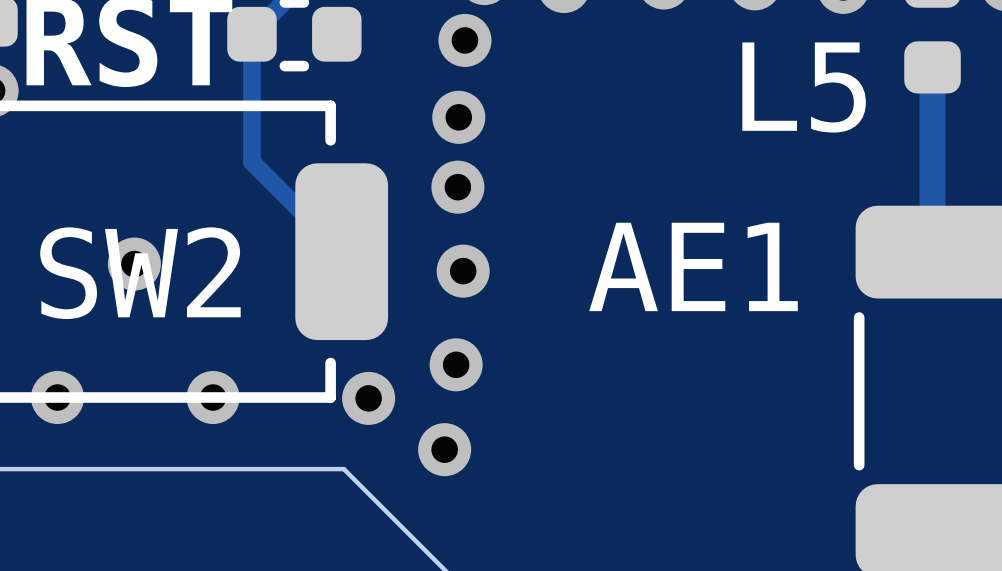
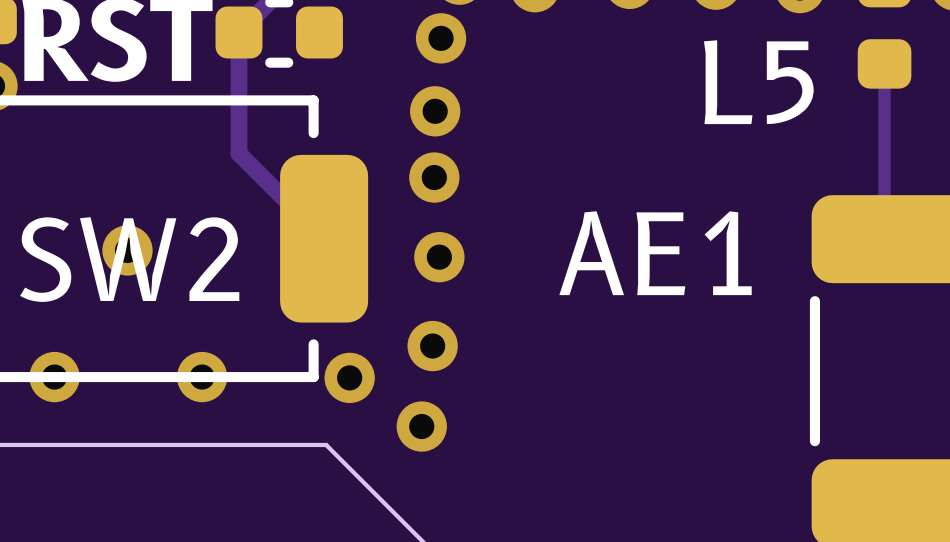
track width: thick (932, 67) (932, 245) (939, 252) -> thin (884, 63) (884, 232) (891, 239)

